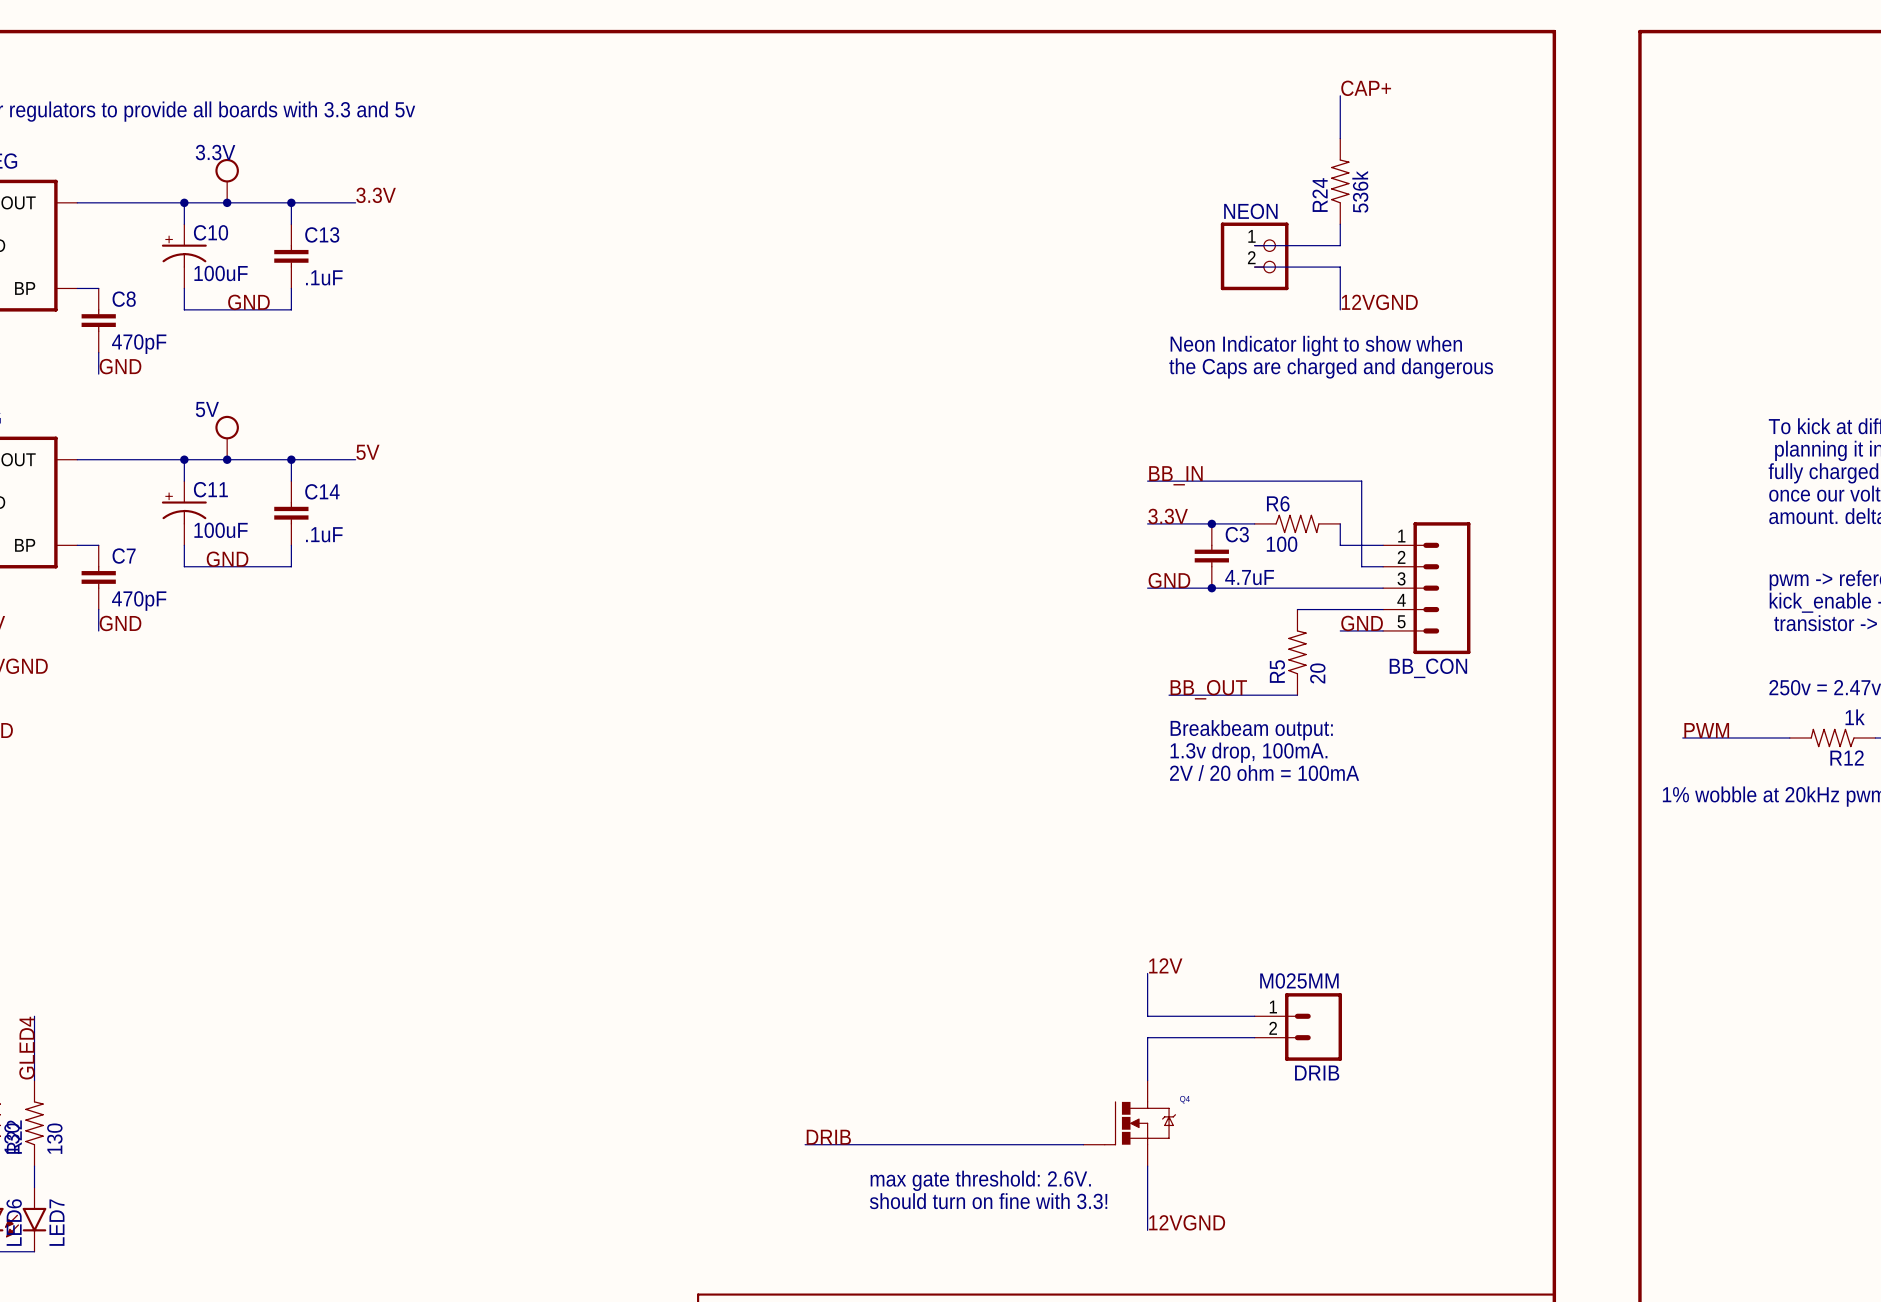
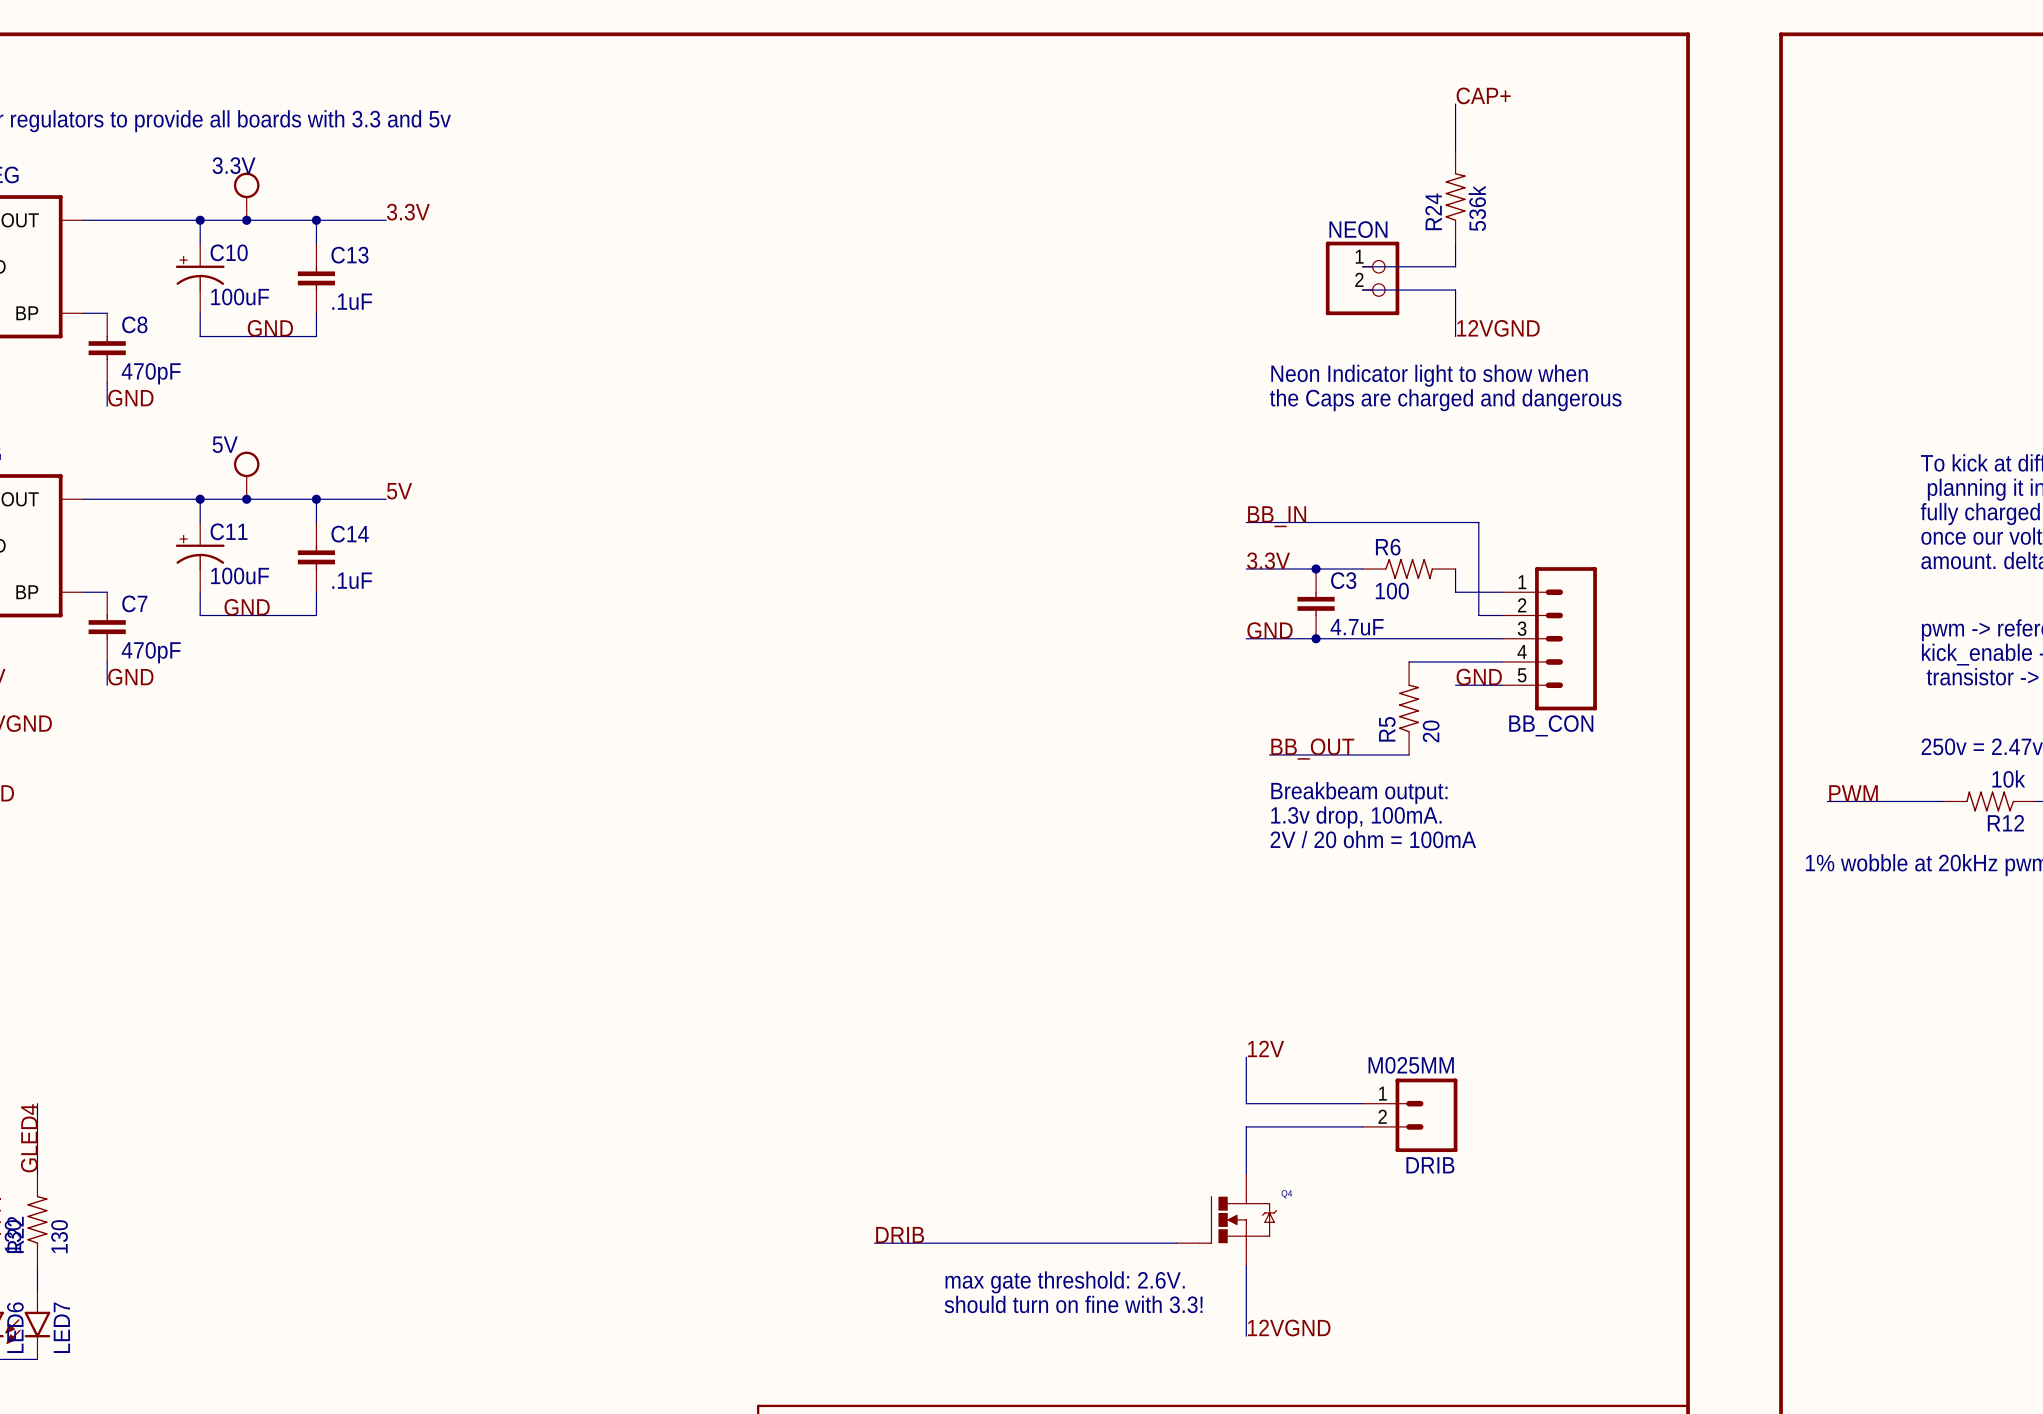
R12 value: 1k (1855, 717) -> 10k (2008, 779)

